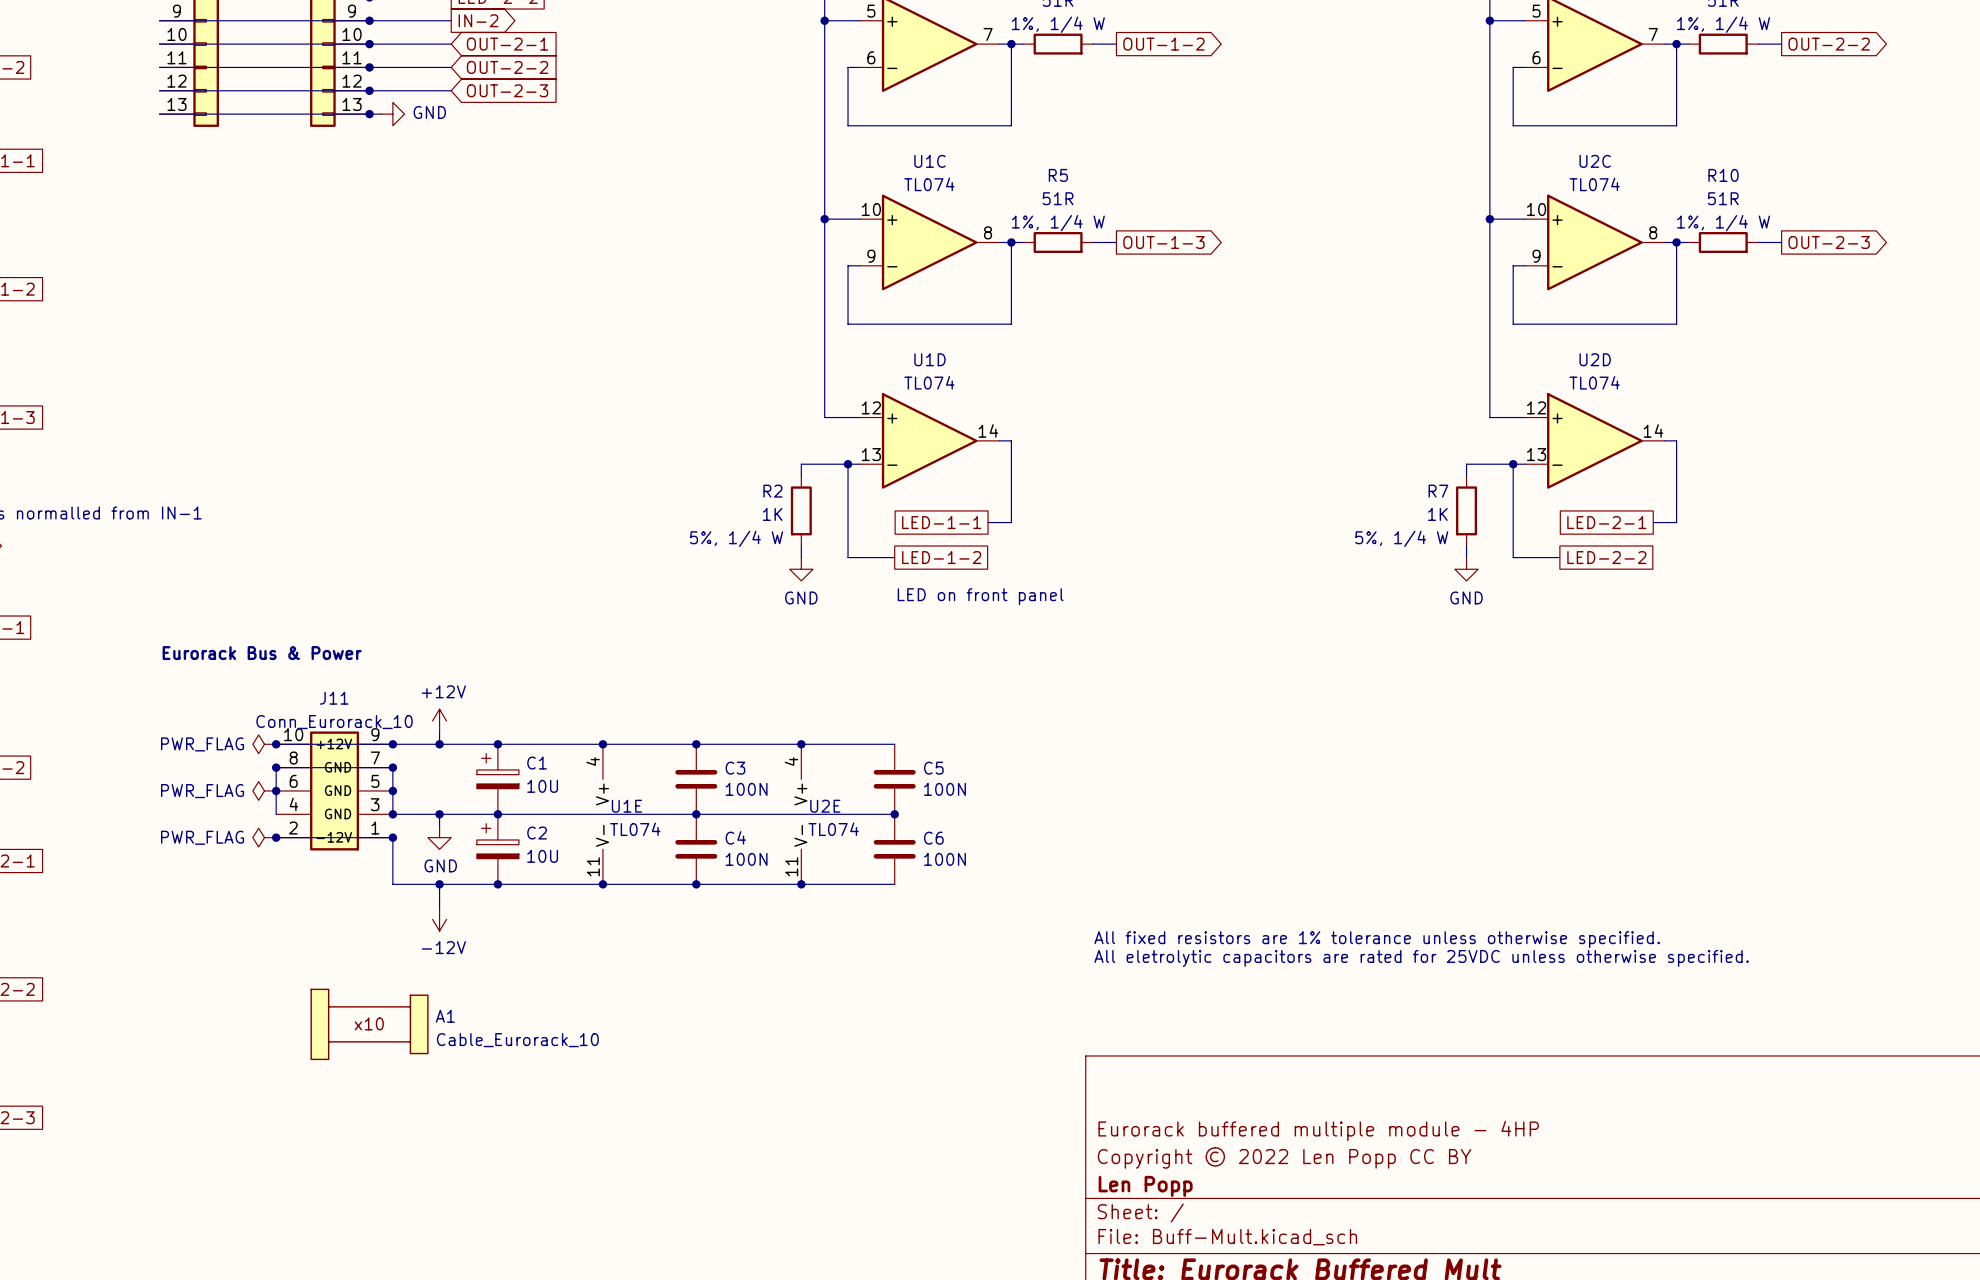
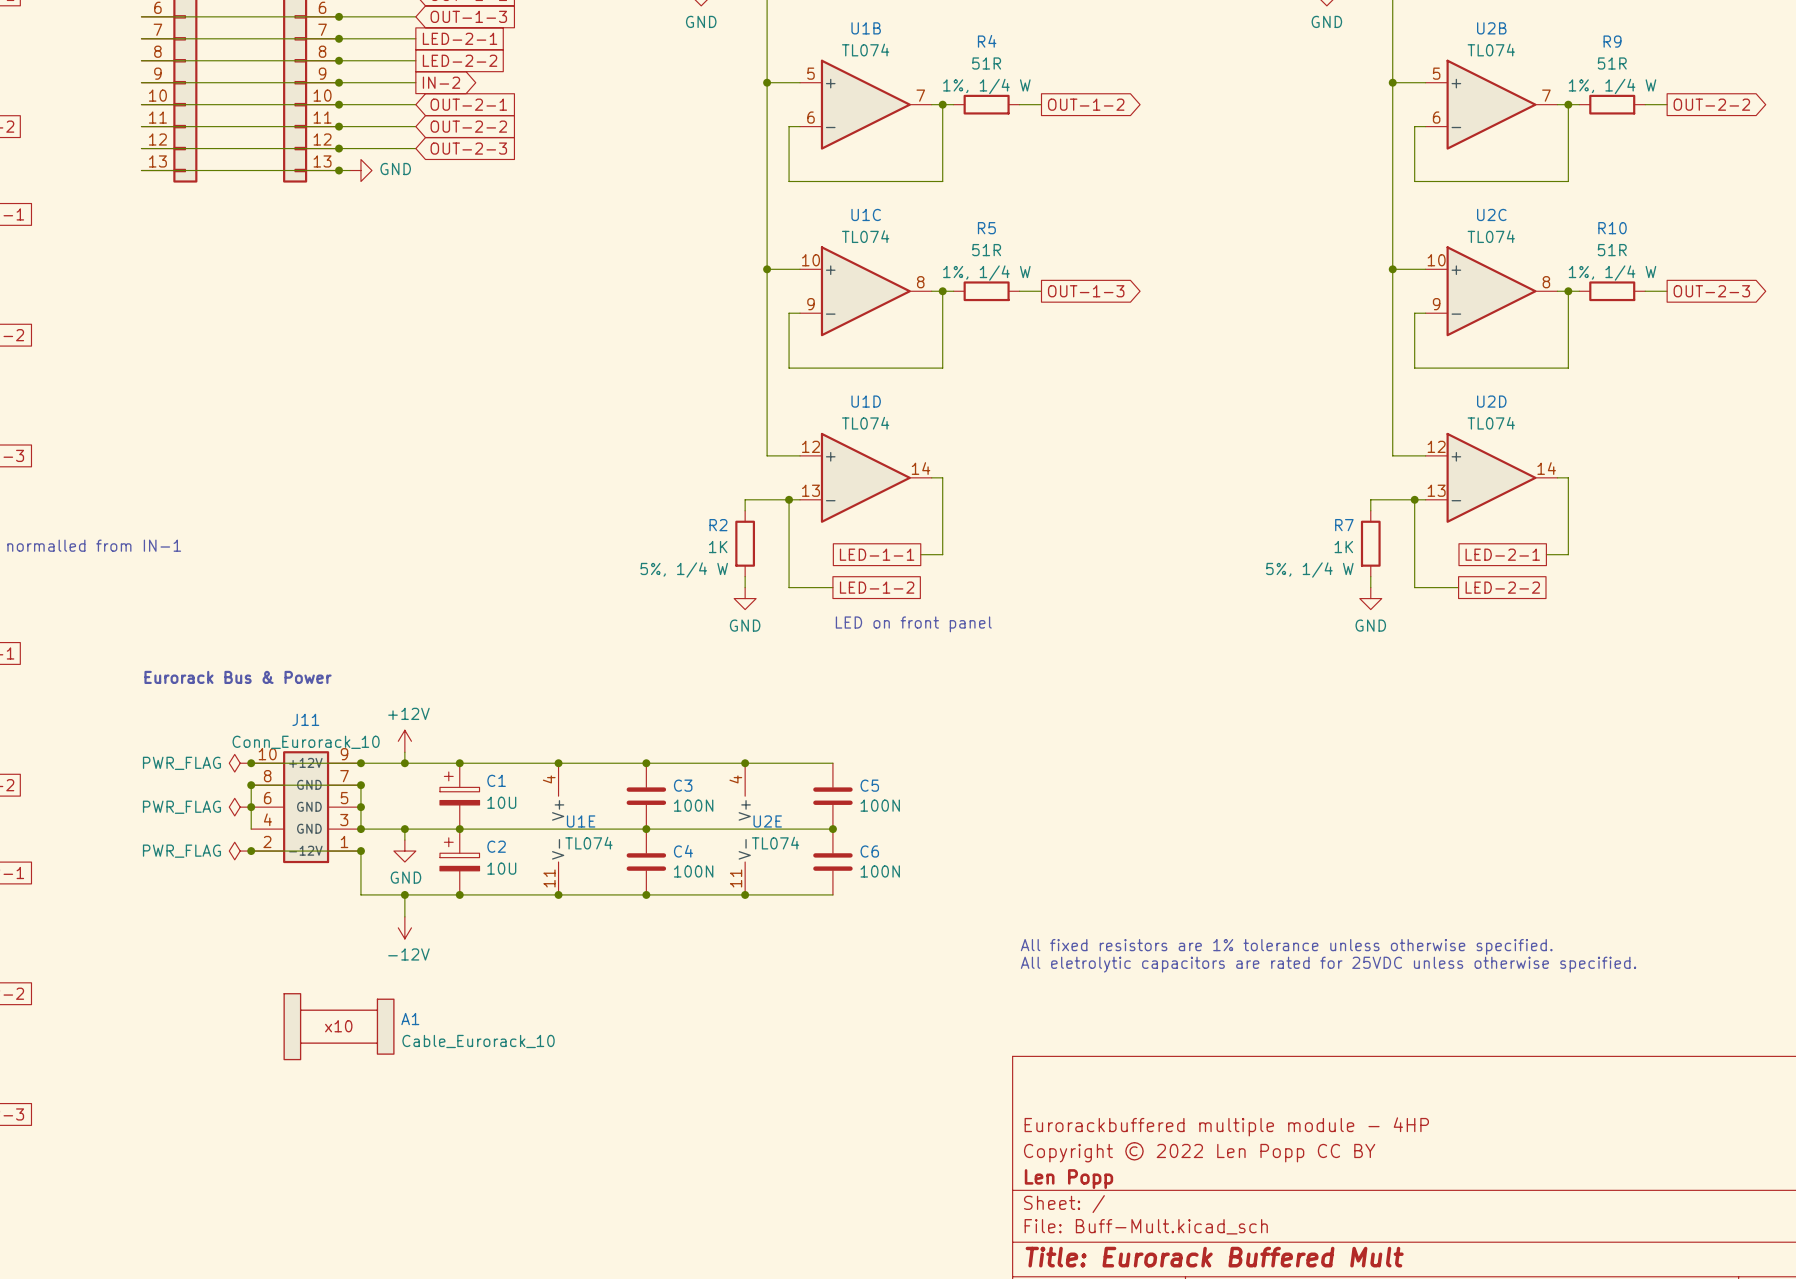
title block: Eurorack buffered multiple module - 4HP (1318, 1130) -> Eurorackbuffered multiple module - 4HP (1226, 1126)

